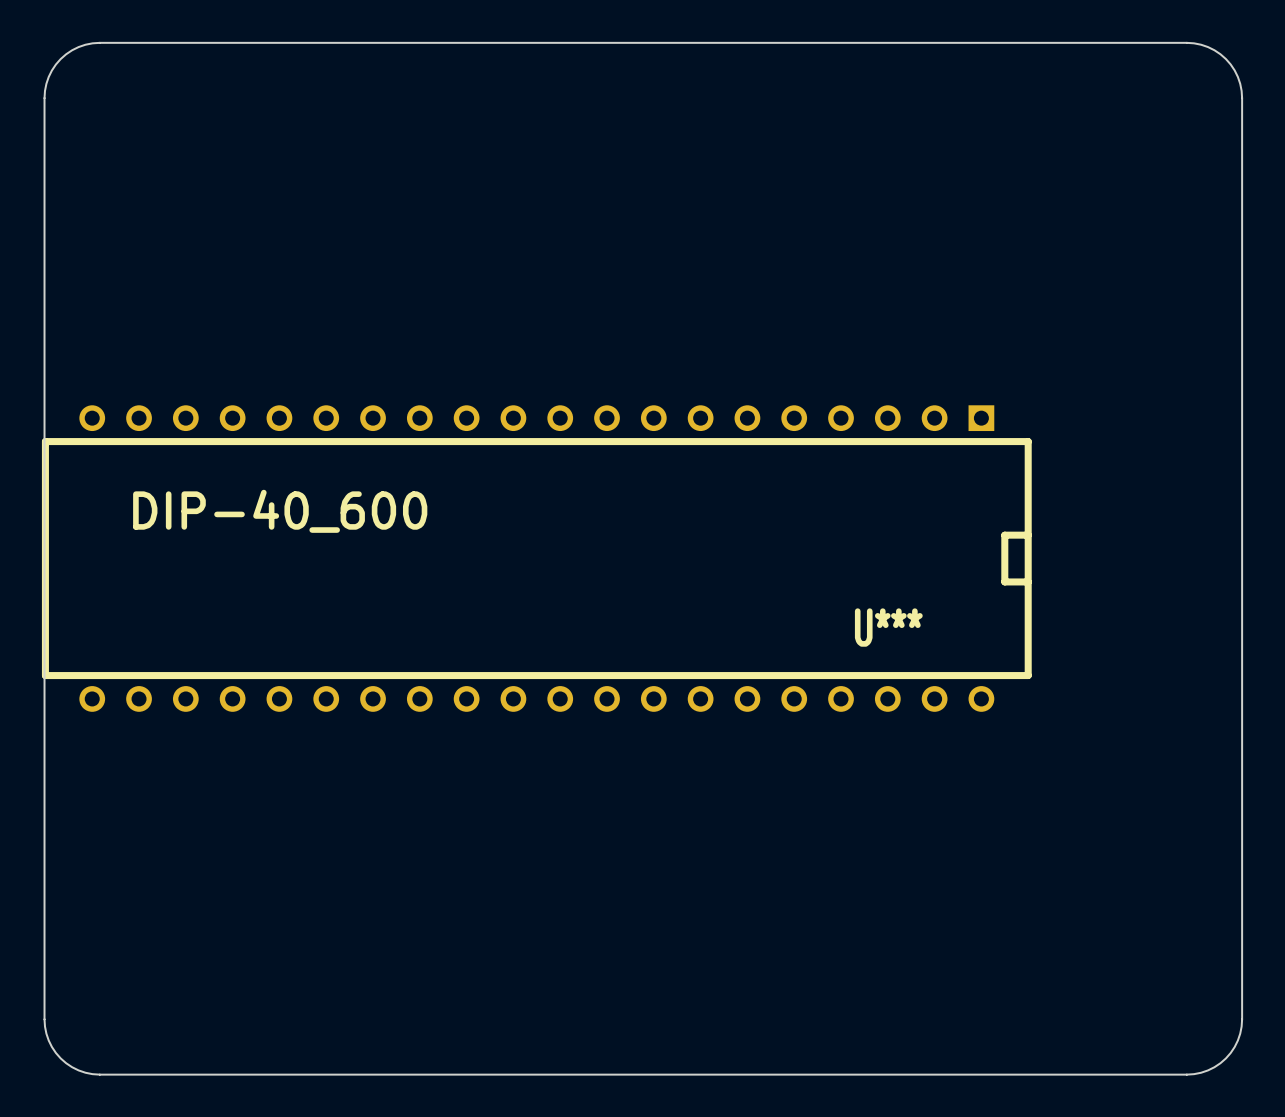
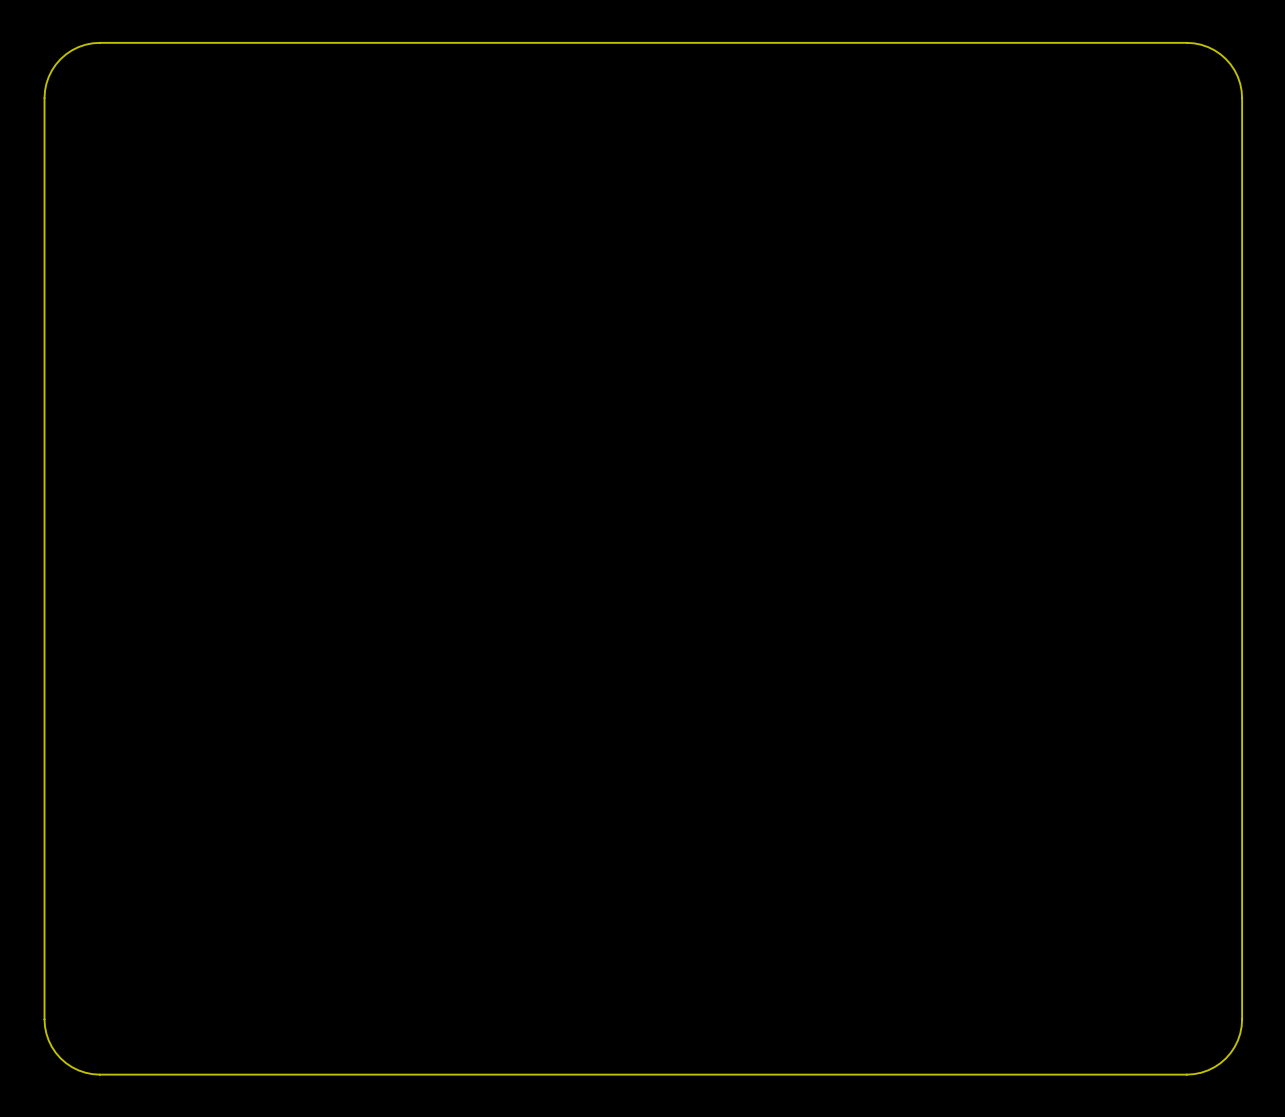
U***: DIP-40_600 (536, 558) -> none

